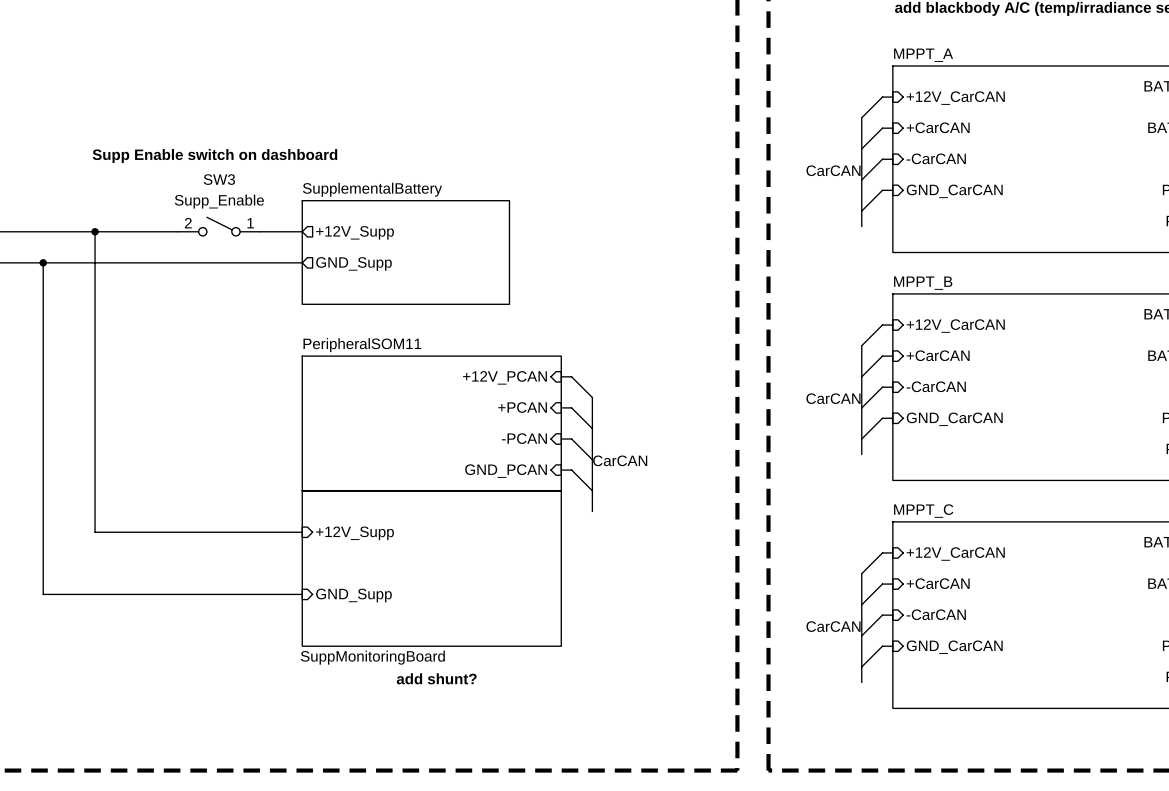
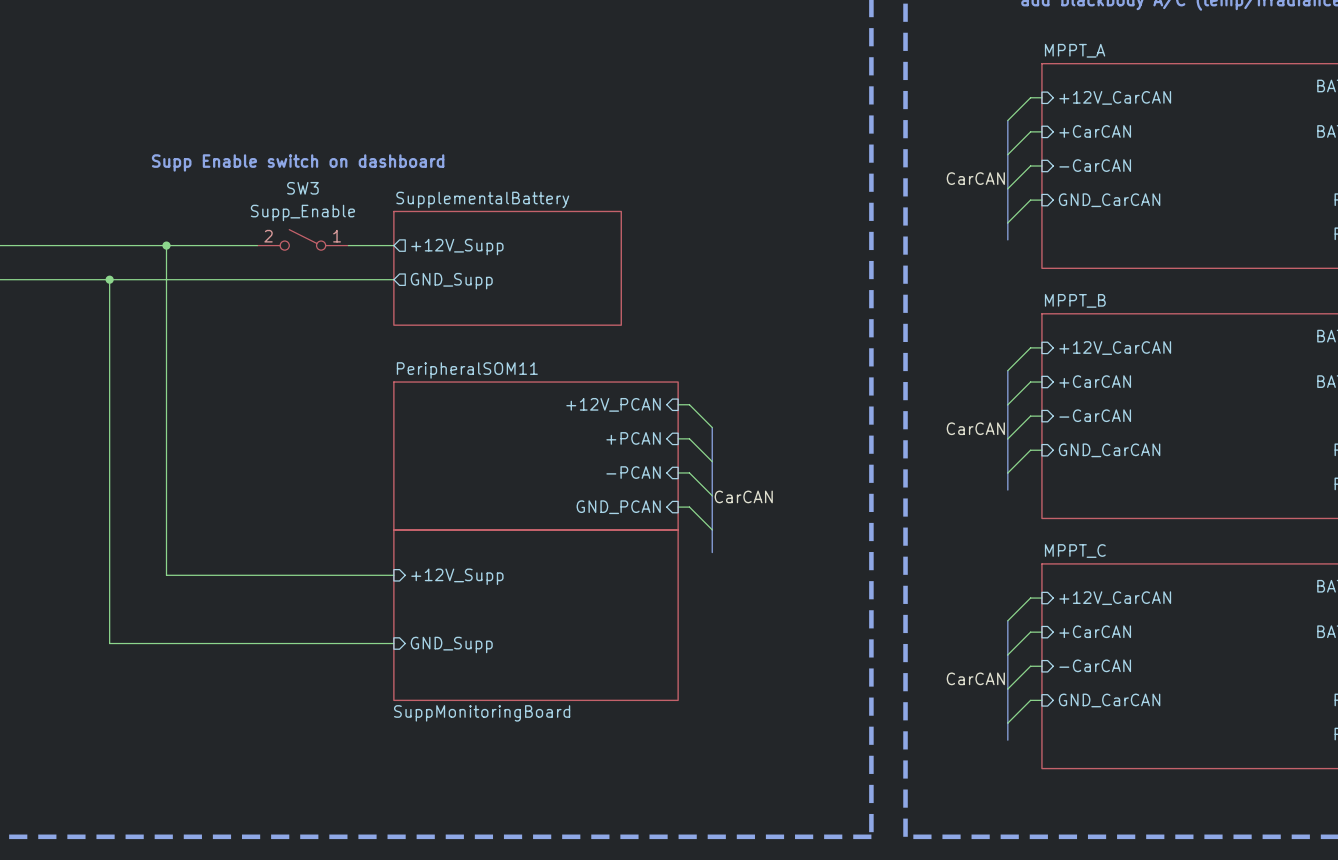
text: add shunt? (436, 678) -> none

